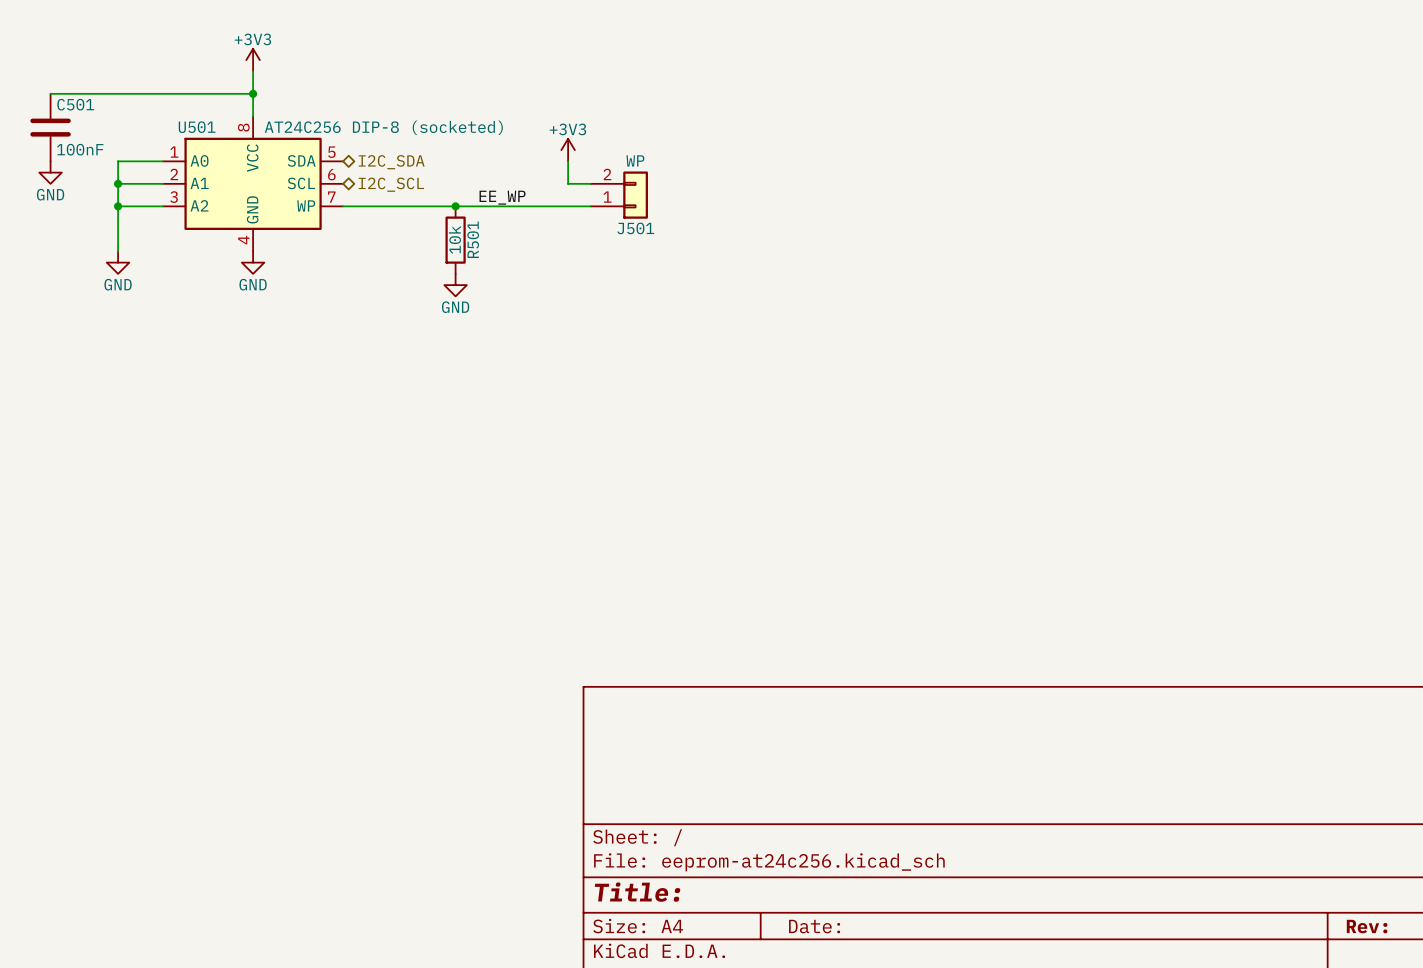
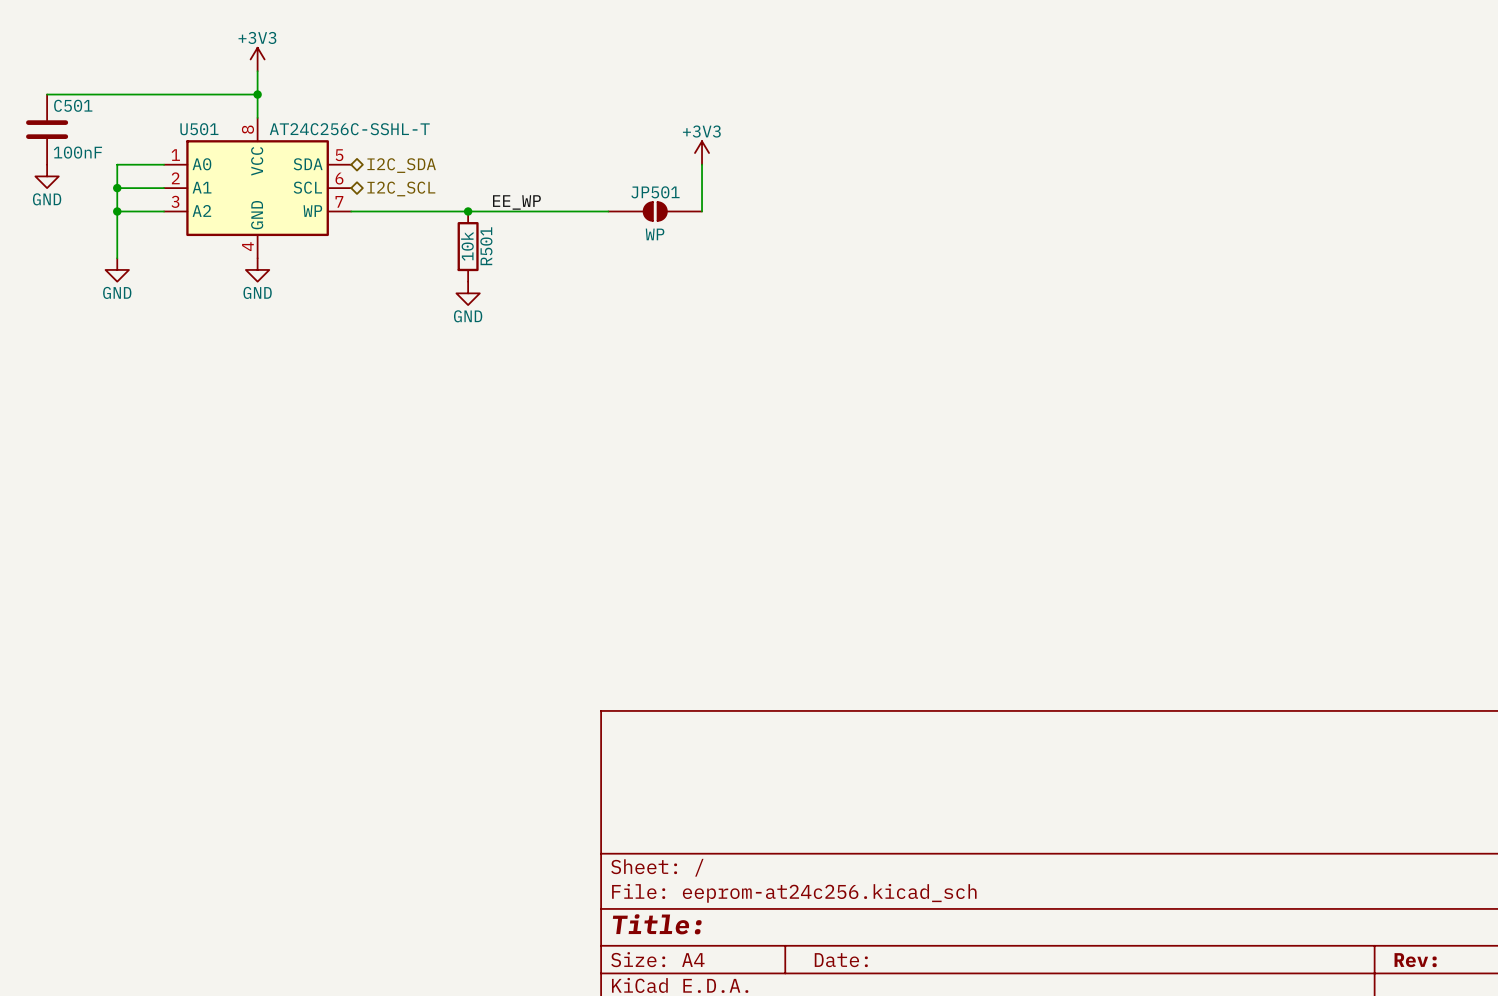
U501 value: AT24C256 DIP-8 (socketed) (383, 127) -> AT24C256C-SSHL-T (349, 129)
power symbol position: +3V3 (568, 150) -> +3V3 (702, 153)
wire: (568, 161) (568, 183) (590, 183) -> none
wire: none -> (702, 164) (702, 211)
J501: WP (619, 195) -> none
JP501: none -> WP (655, 211)

